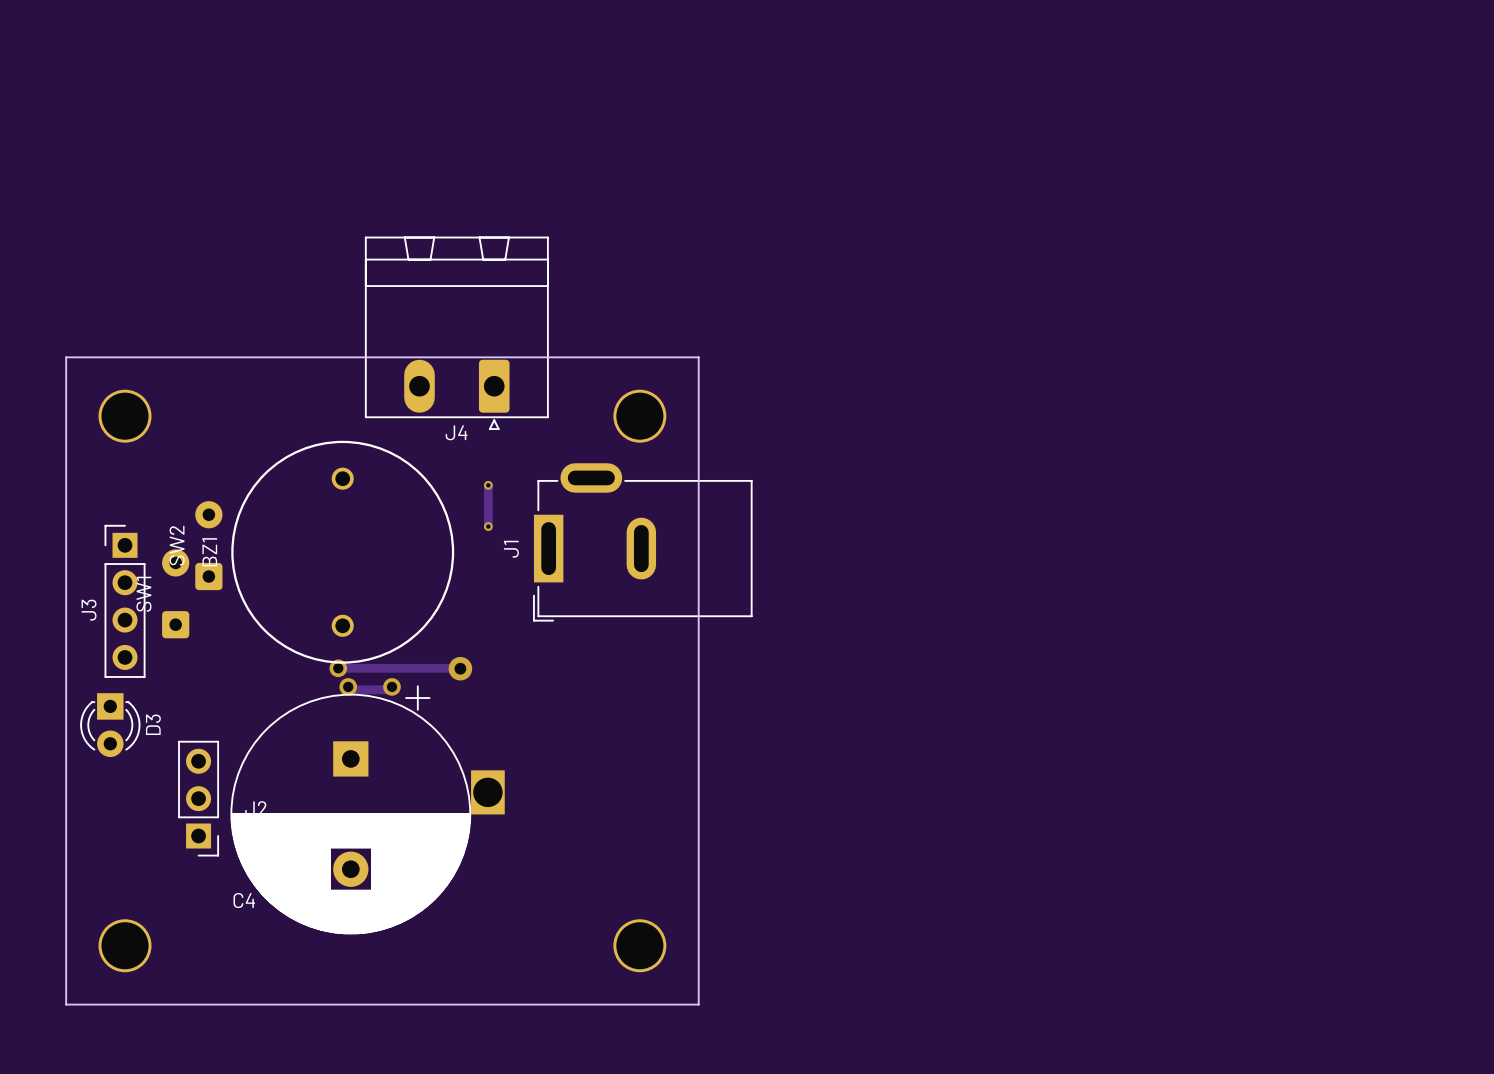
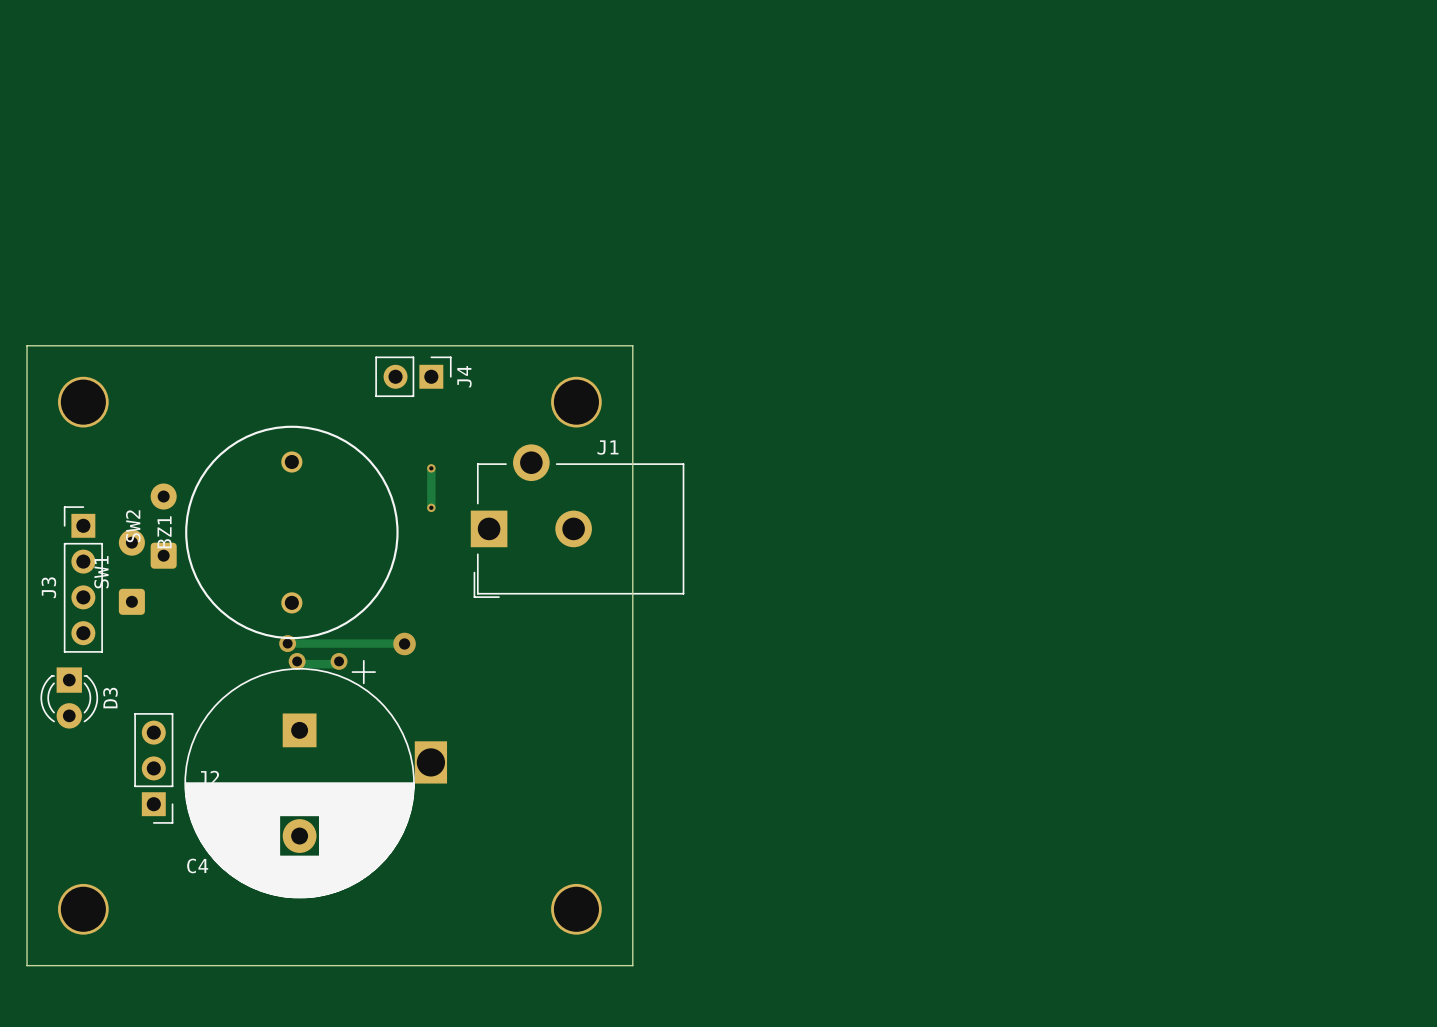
J4 footprint: [364, 236, 549, 430] -> [375, 356, 452, 398]
J4 name position: J4 (456, 432) -> J4 (464, 376)
J1 footprint: [533, 463, 753, 622] -> [470, 444, 685, 598]
J1 name position: J1 (511, 549) -> J1 (607, 447)

